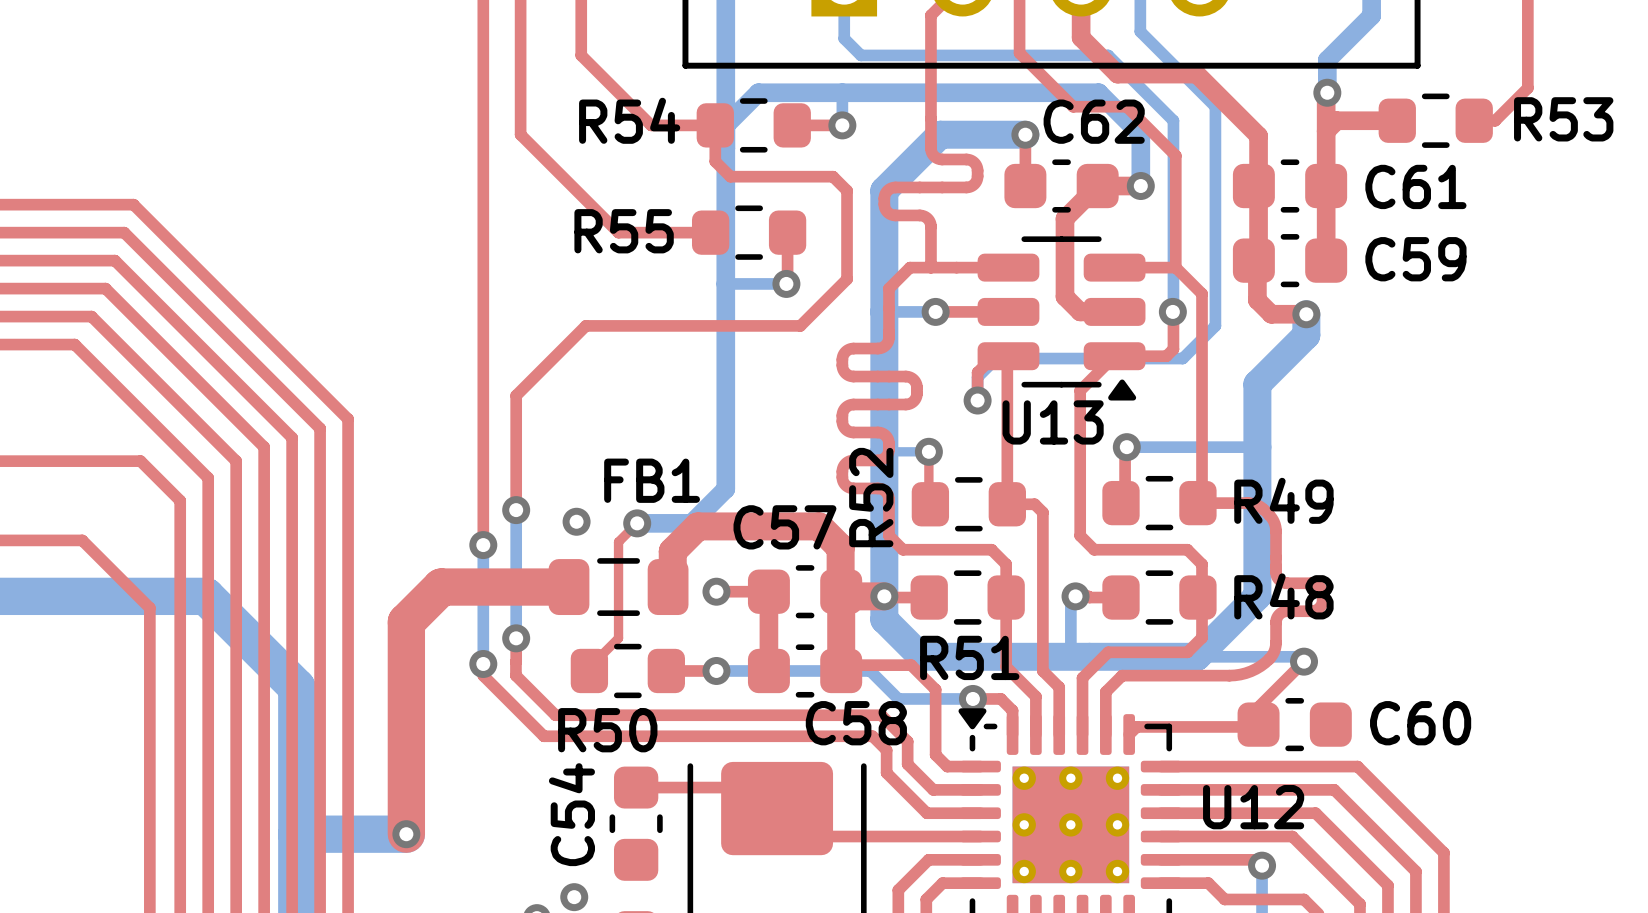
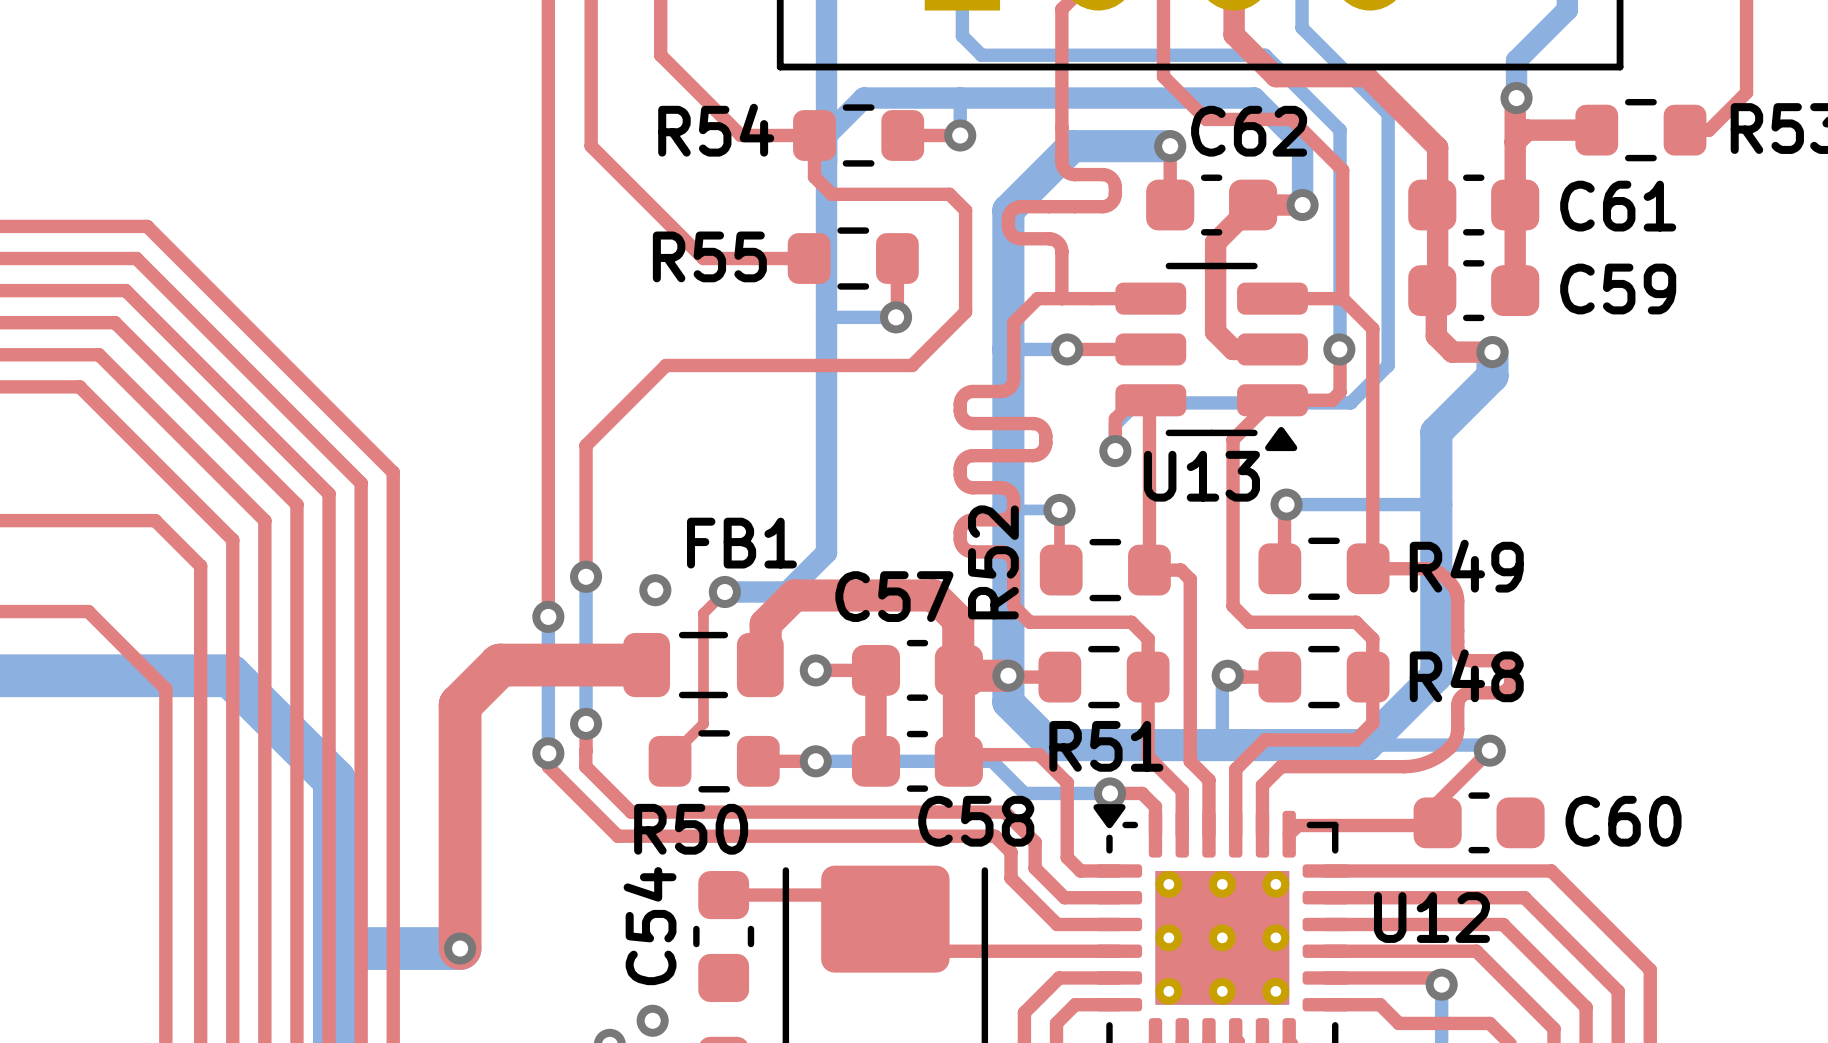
top track: (1019, 53) (1073, 106) (1126, 106) (1131, 111) -> (1163, 52) (1163, 76) (1206, 119) (1291, 119)

